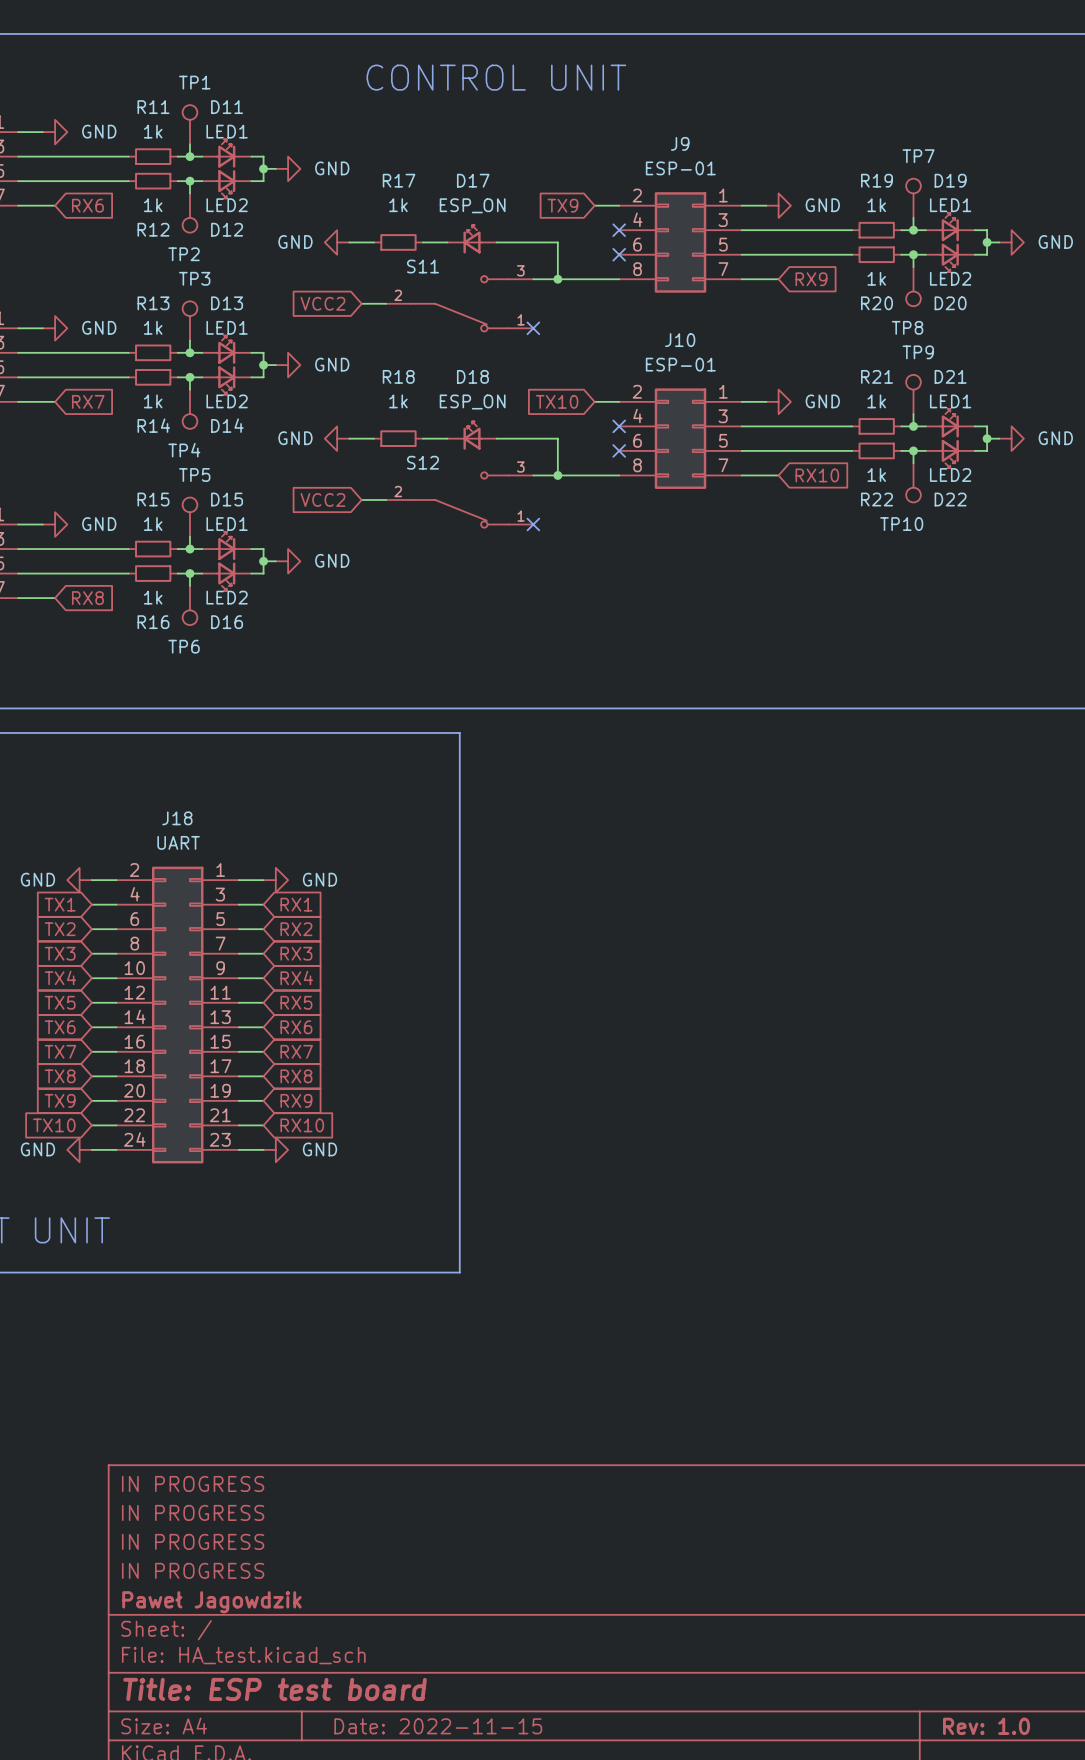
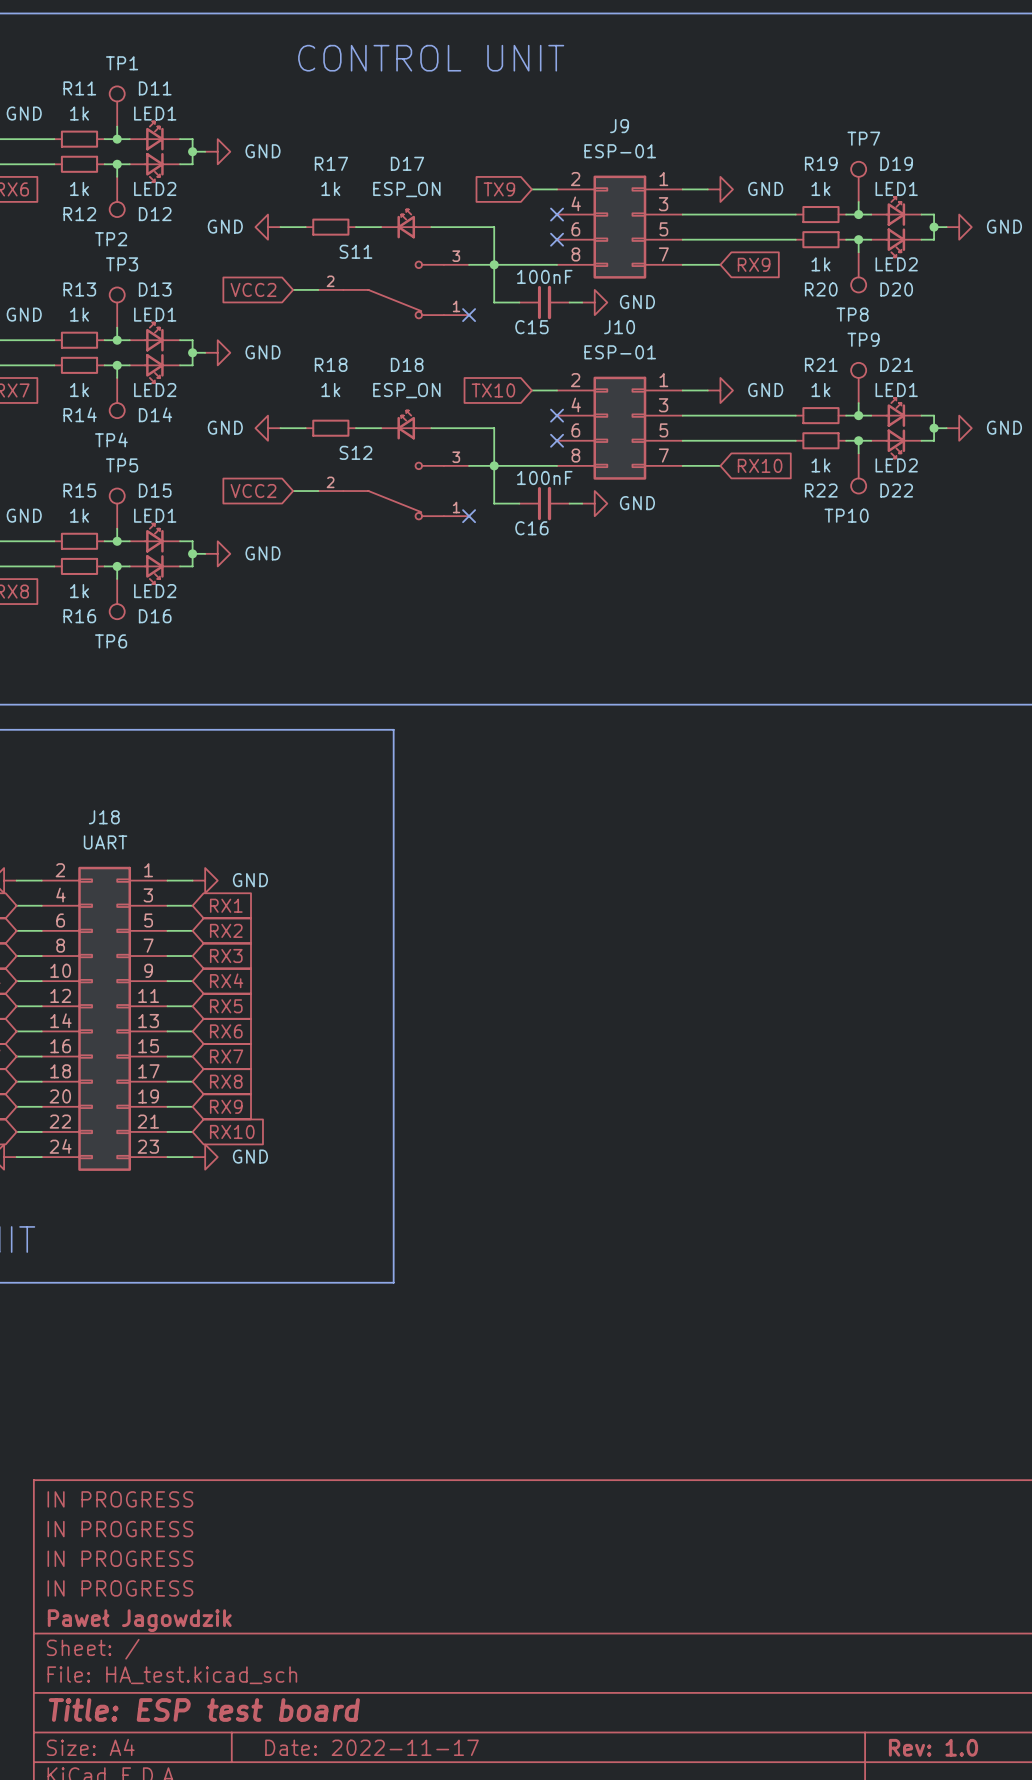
wire: none -> (494, 264) (494, 302) (519, 302)
C15: none -> 100nF (544, 302)
wire: none -> (569, 302) (582, 302)
power symbol: none -> GND (594, 302)
wire: none -> (494, 465) (494, 503) (519, 503)
C16: none -> 100nF (544, 503)
wire: none -> (569, 503) (582, 503)
power symbol: none -> GND (594, 503)
title block: Date: 2022-11-15 (438, 1726) -> Date: 2022-11-17 (372, 1747)

